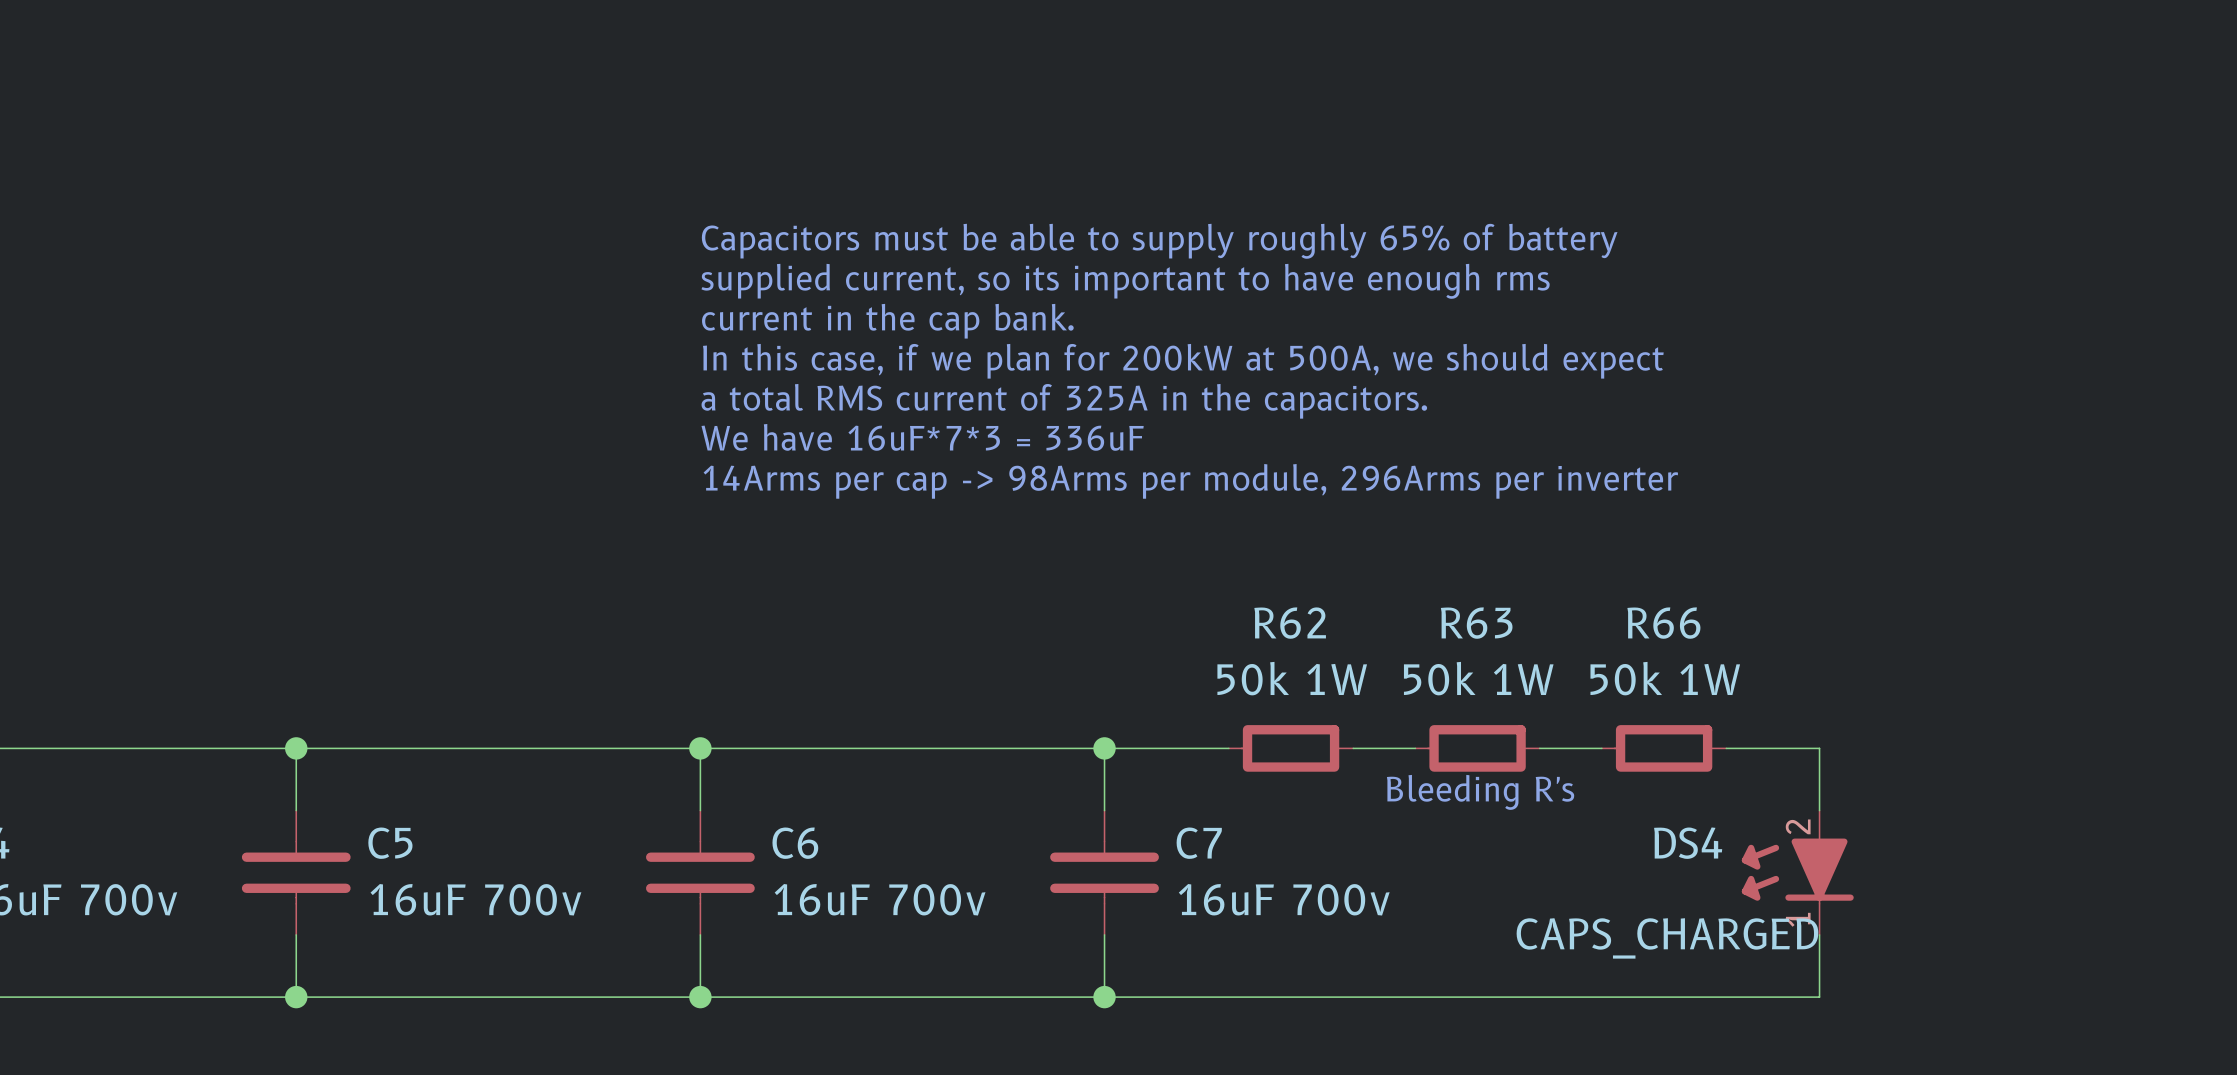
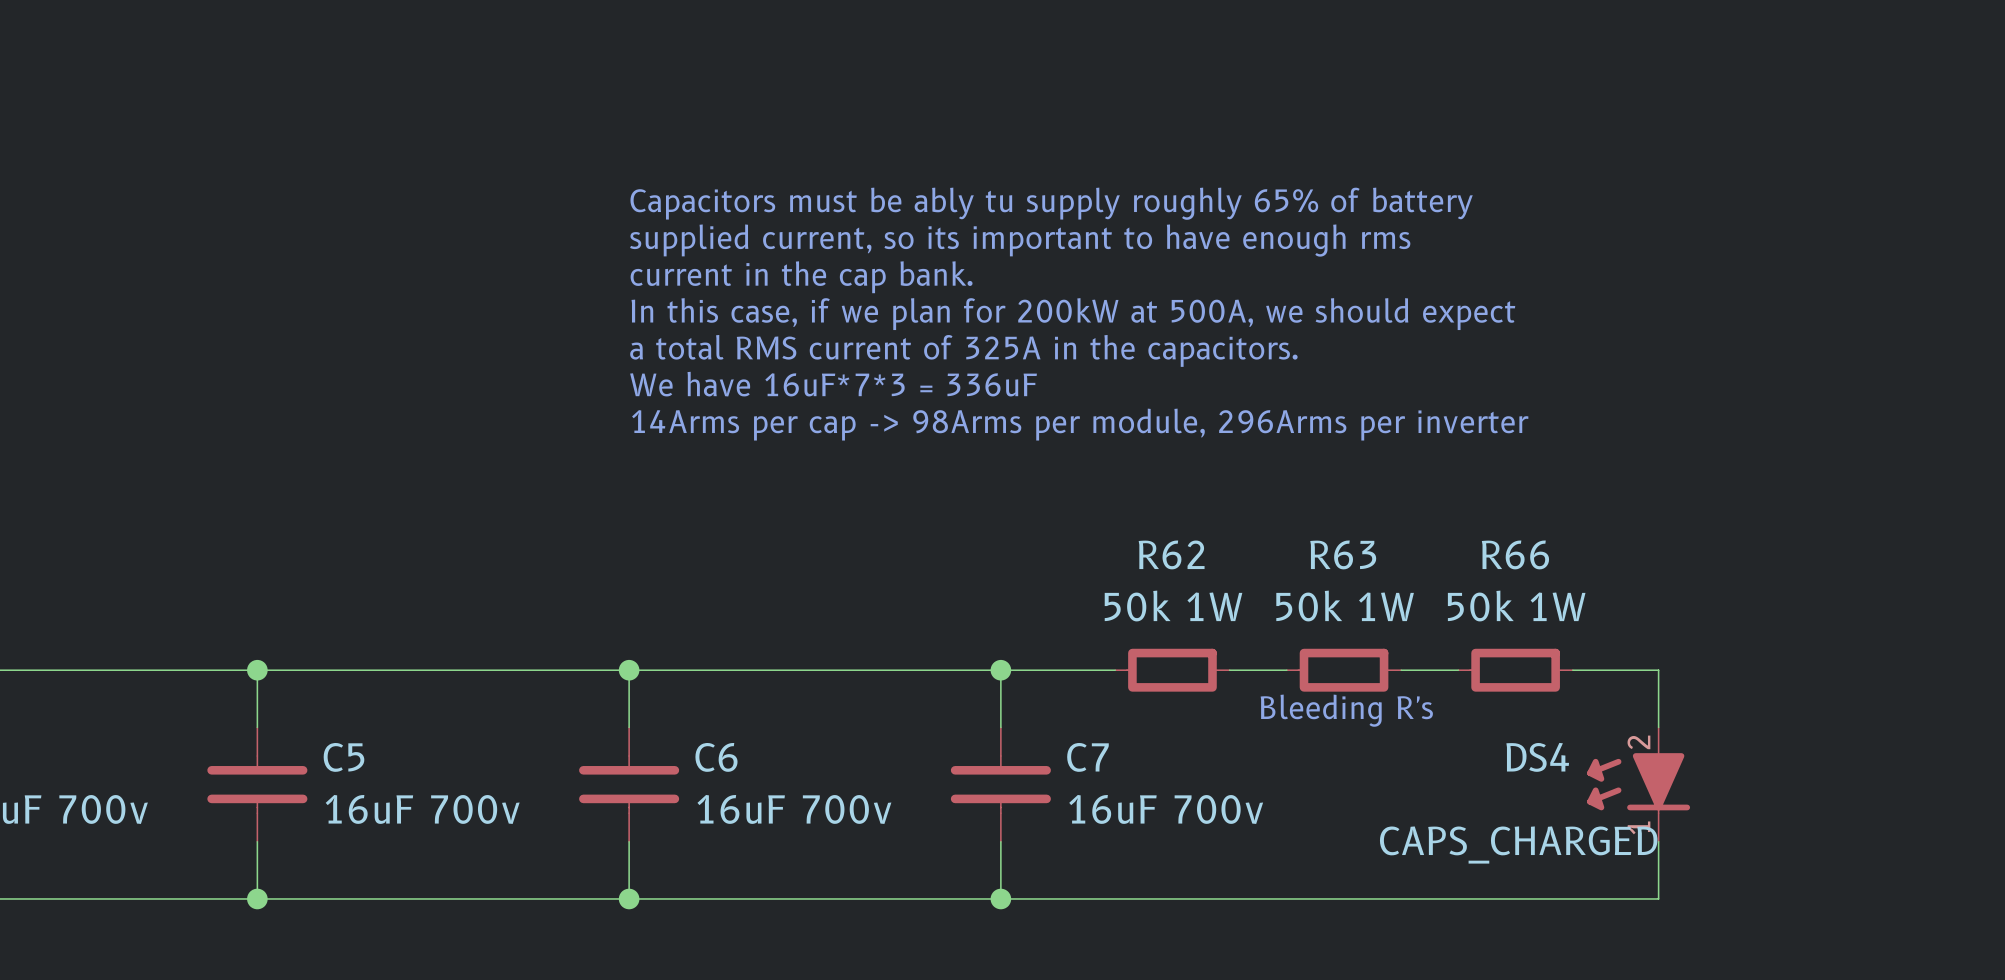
text: Capacitors must be able to supply roughly 65% of battery (1159, 241) -> Capacitors must be ably tu supply roughly 65% of battery (1051, 203)

